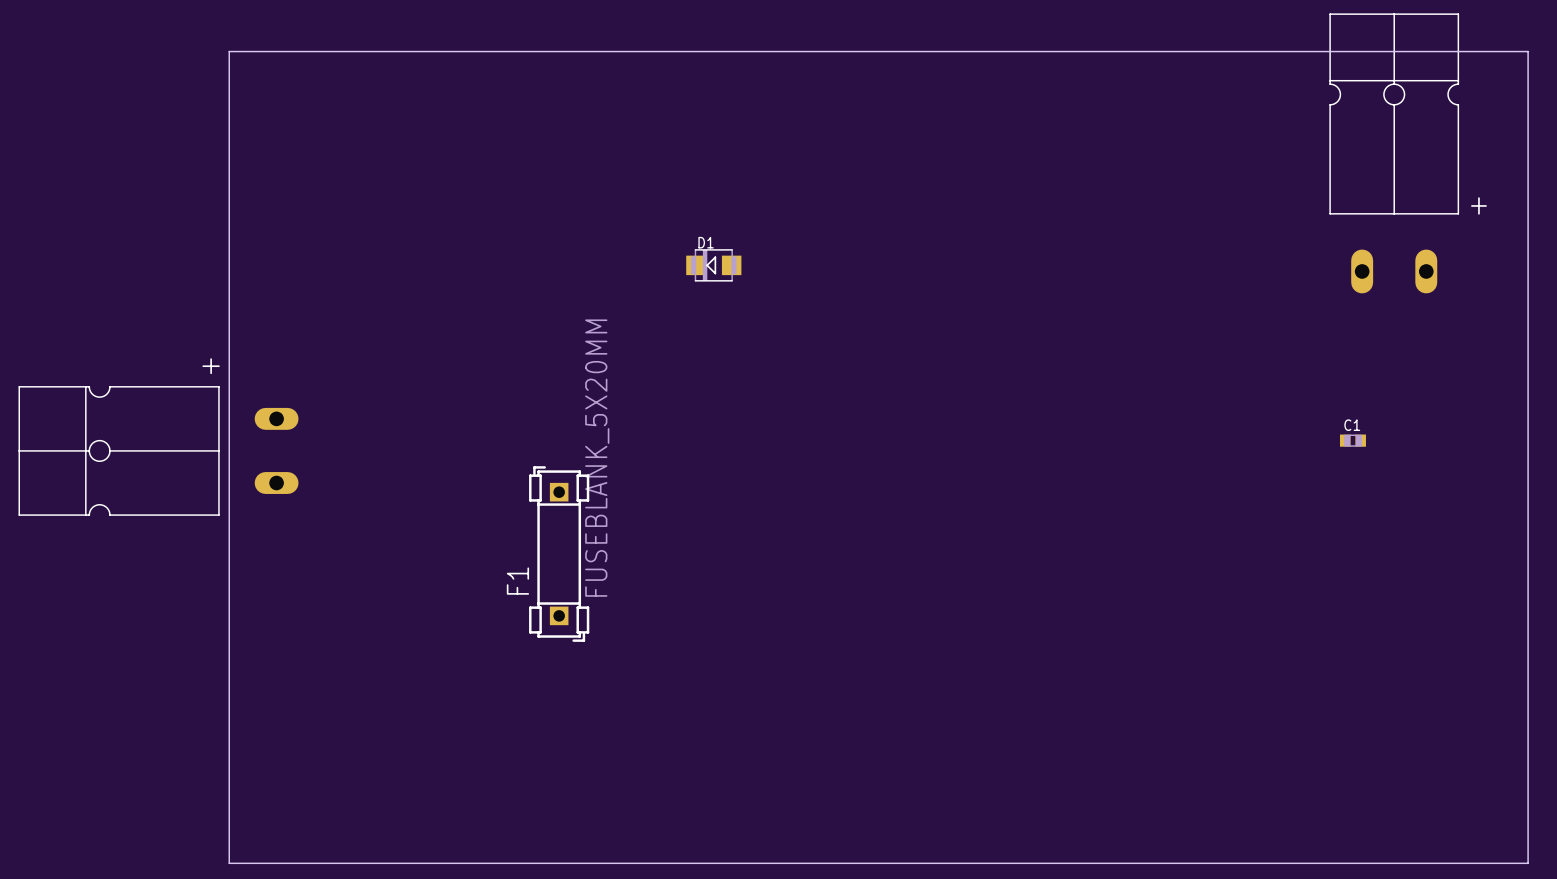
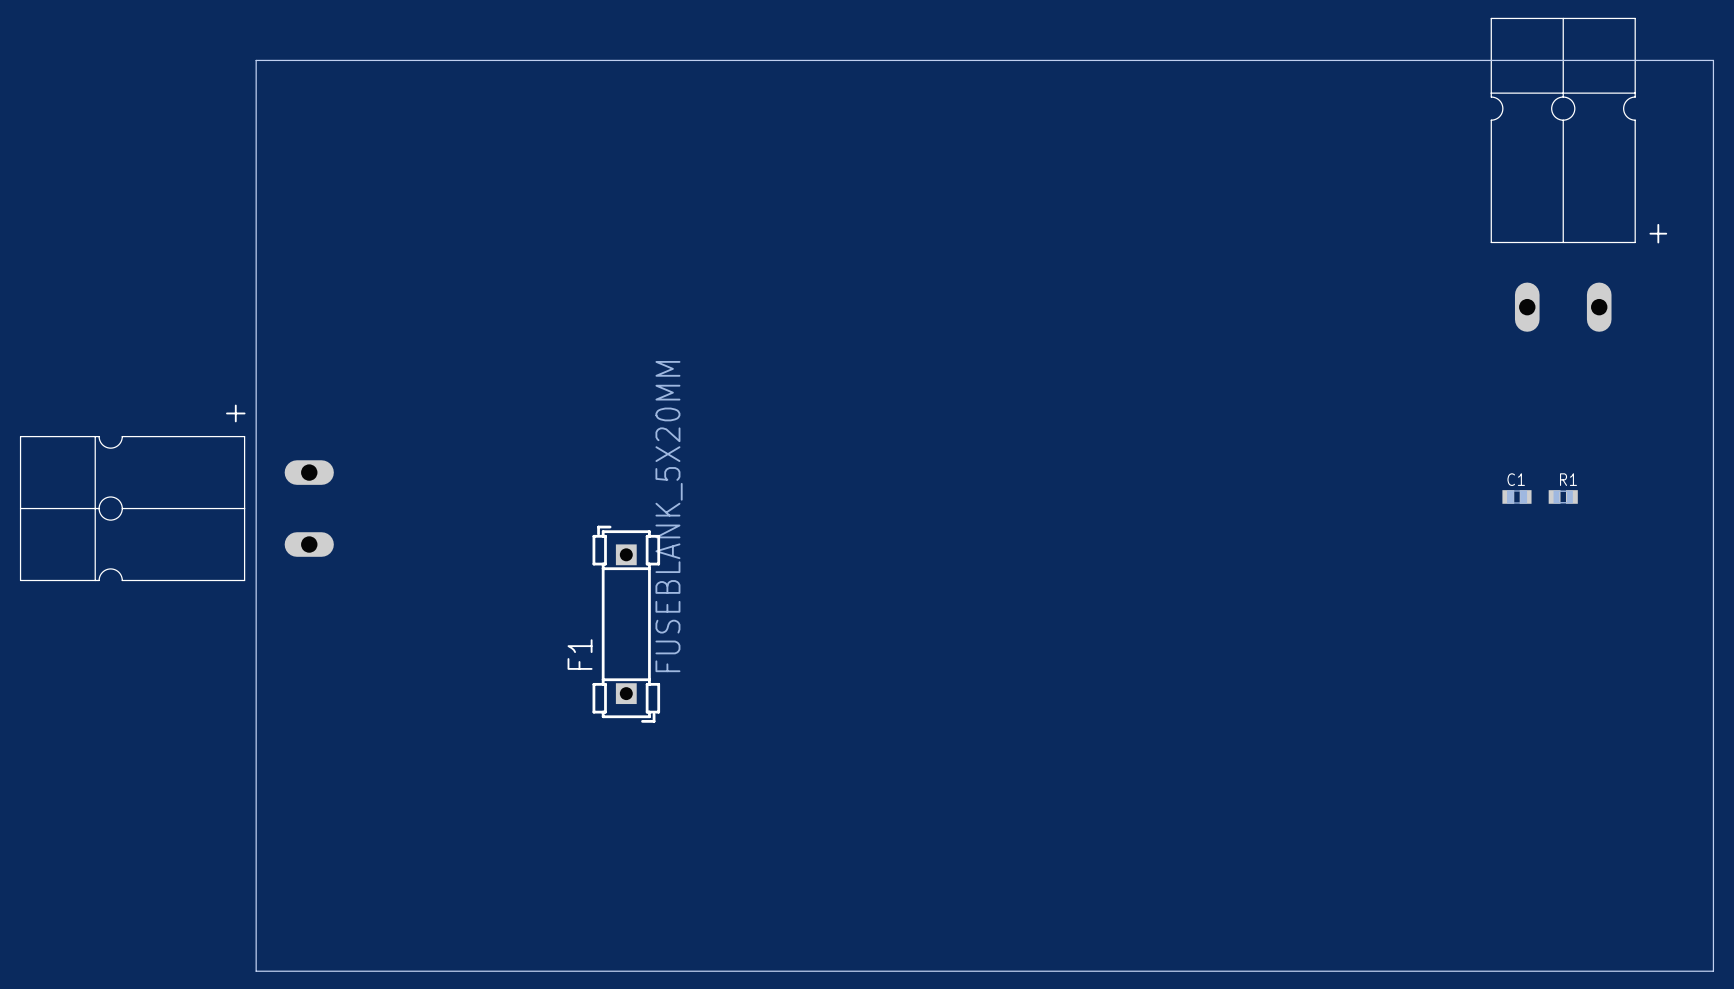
D1: (713, 265) -> none
R1: none -> (1563, 496)

